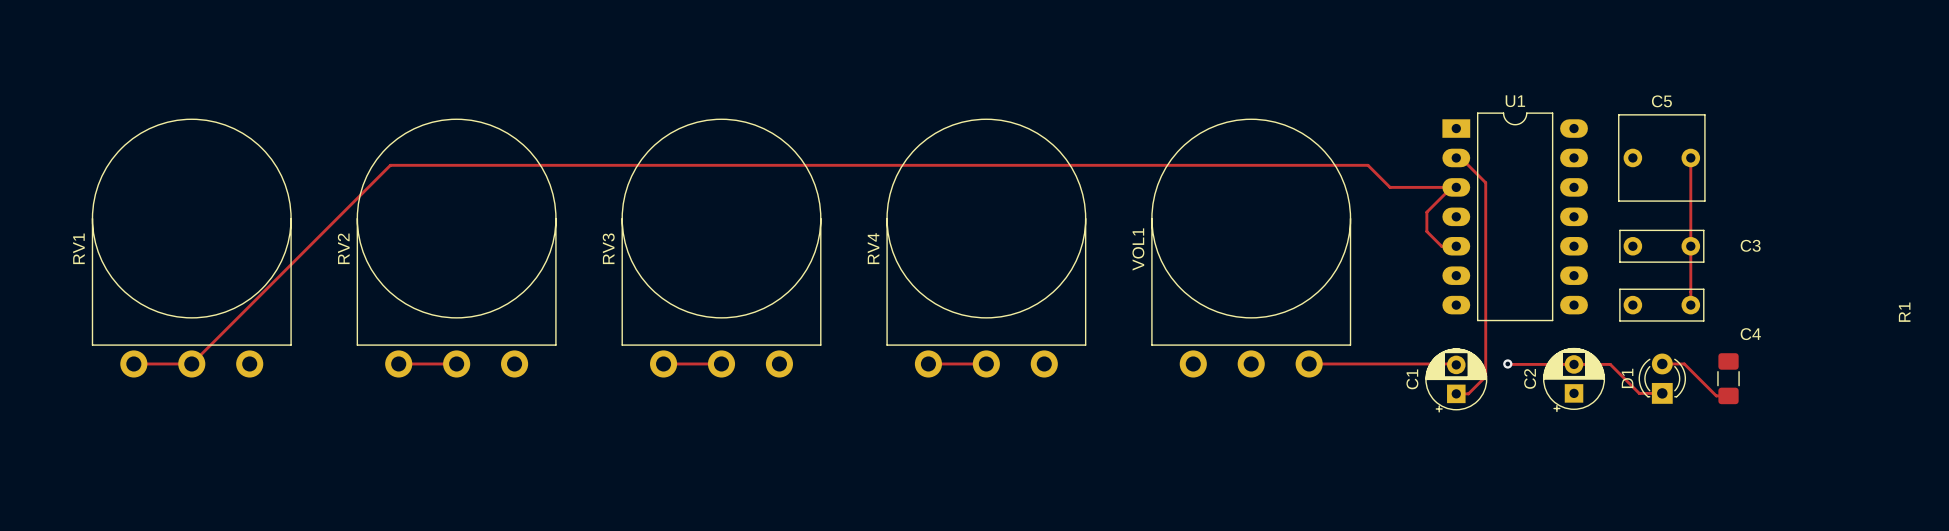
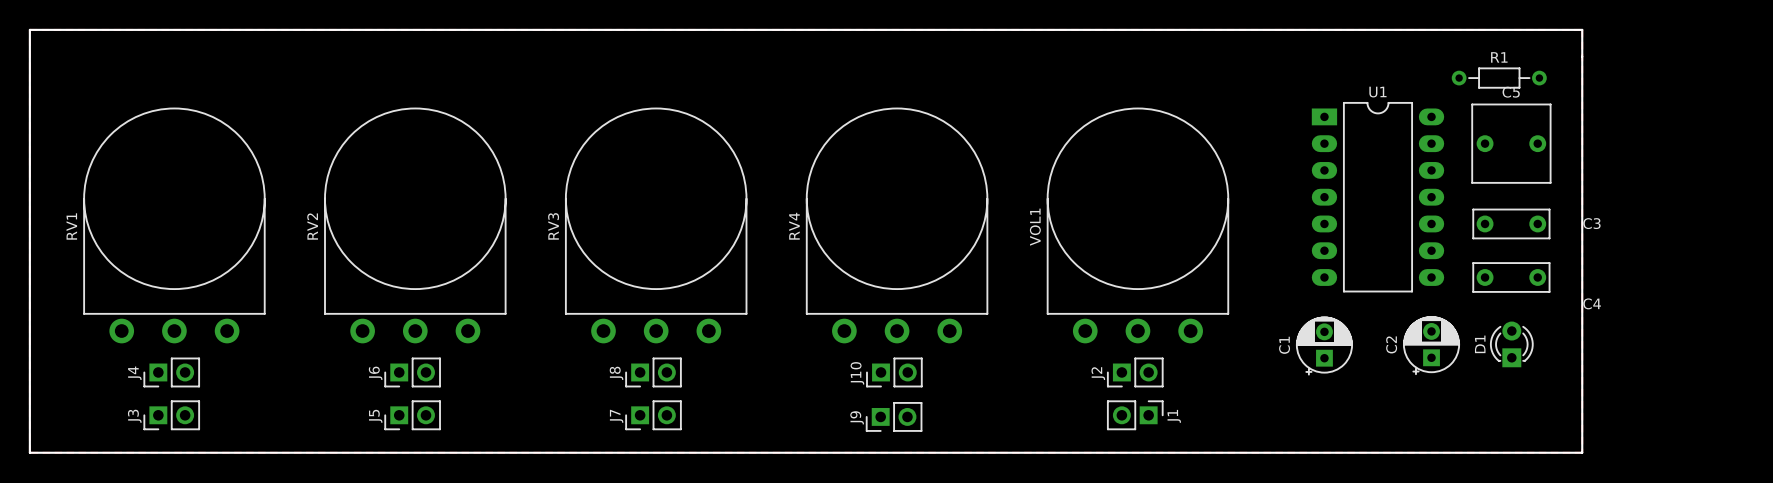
board edge: none -> (29, 29) (1582, 29) (1582, 452) (29, 452) (29, 29)
track: (1456, 157) (1460, 157) (1485, 182) (1485, 376) (1468, 393) (1456, 393) -> none
track: (1690, 157) (1690, 305) -> none
track: (1451, 187) (1426, 212) (1426, 231) (1441, 246) (1456, 246) -> none
track: (1456, 187) (1390, 187) (1368, 165) (390, 165) (191, 363) (133, 363) -> none
R1 name position: R1 (1904, 312) -> R1 (1499, 57)
R1 footprint: [1717, 353, 1740, 405] -> [1451, 67, 1547, 89]
track: (398, 363) (456, 363) -> none
track: (663, 363) (721, 363) -> none
track: (928, 363) (986, 363) -> none
track: (1309, 363) (1456, 364) -> none
track: (1507, 363) (1610, 364) (1639, 393) (1662, 393) -> none
via: (1507, 363) -> none
track: (1662, 363) (1684, 363) (1716, 395) (1728, 395) -> none
J4: none -> (171, 372)
J6: none -> (412, 372)
J8: none -> (653, 372)
J10: none -> (894, 372)
J2: none -> (1135, 372)
J3: none -> (171, 415)
J5: none -> (412, 415)
J7: none -> (653, 415)
J1: none -> (1135, 415)
J9: none -> (894, 416)

